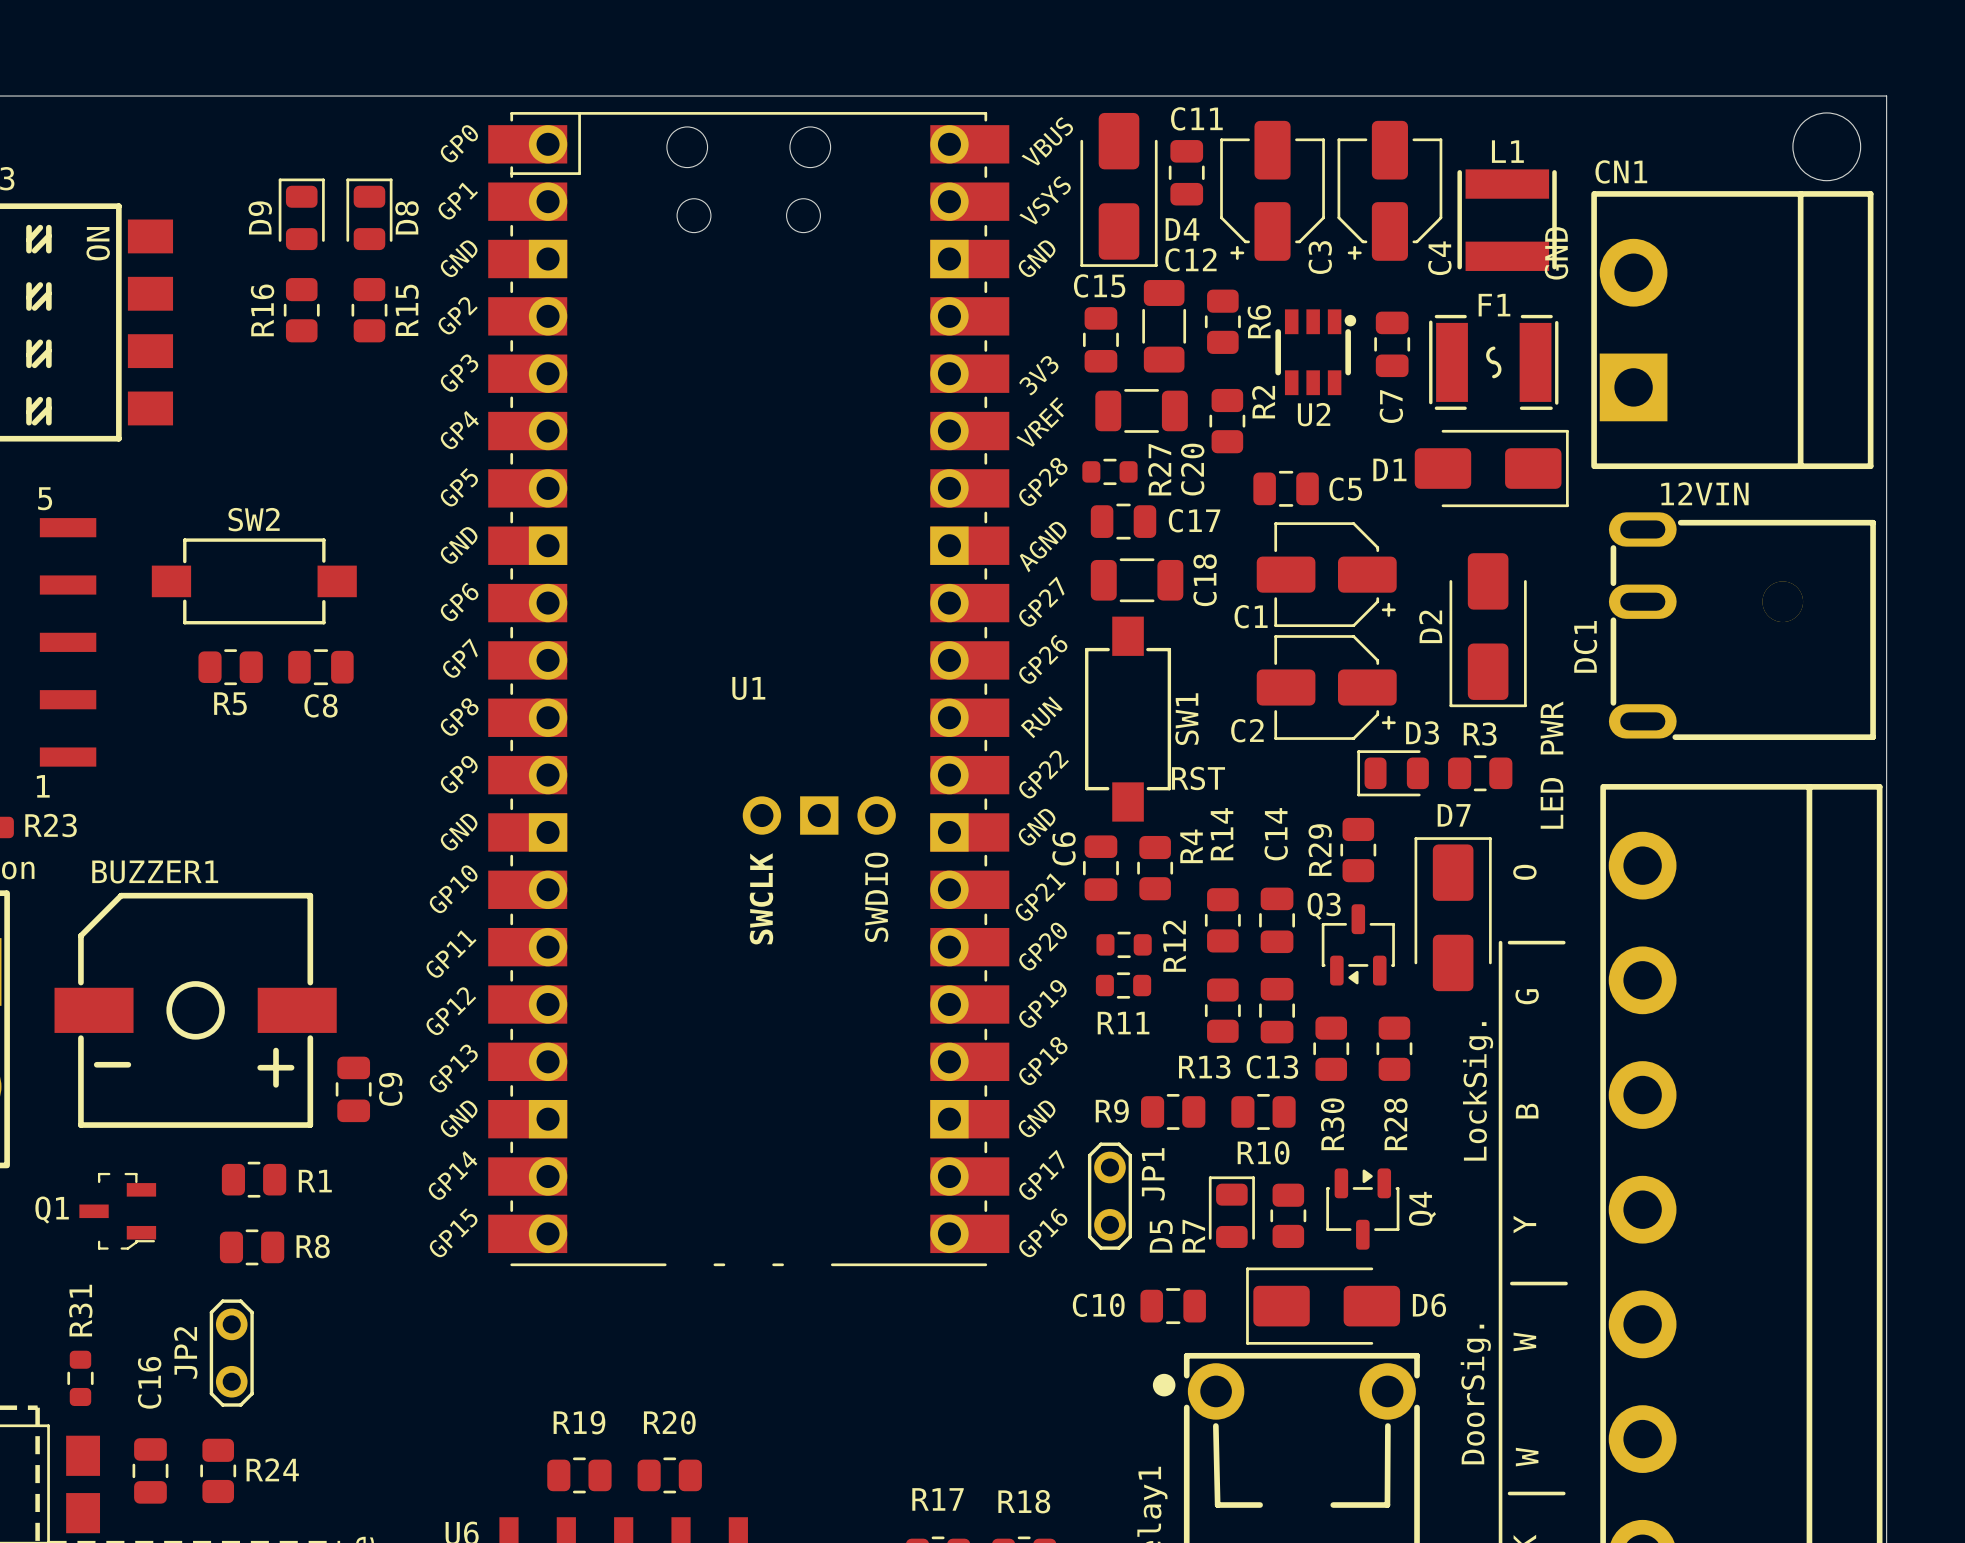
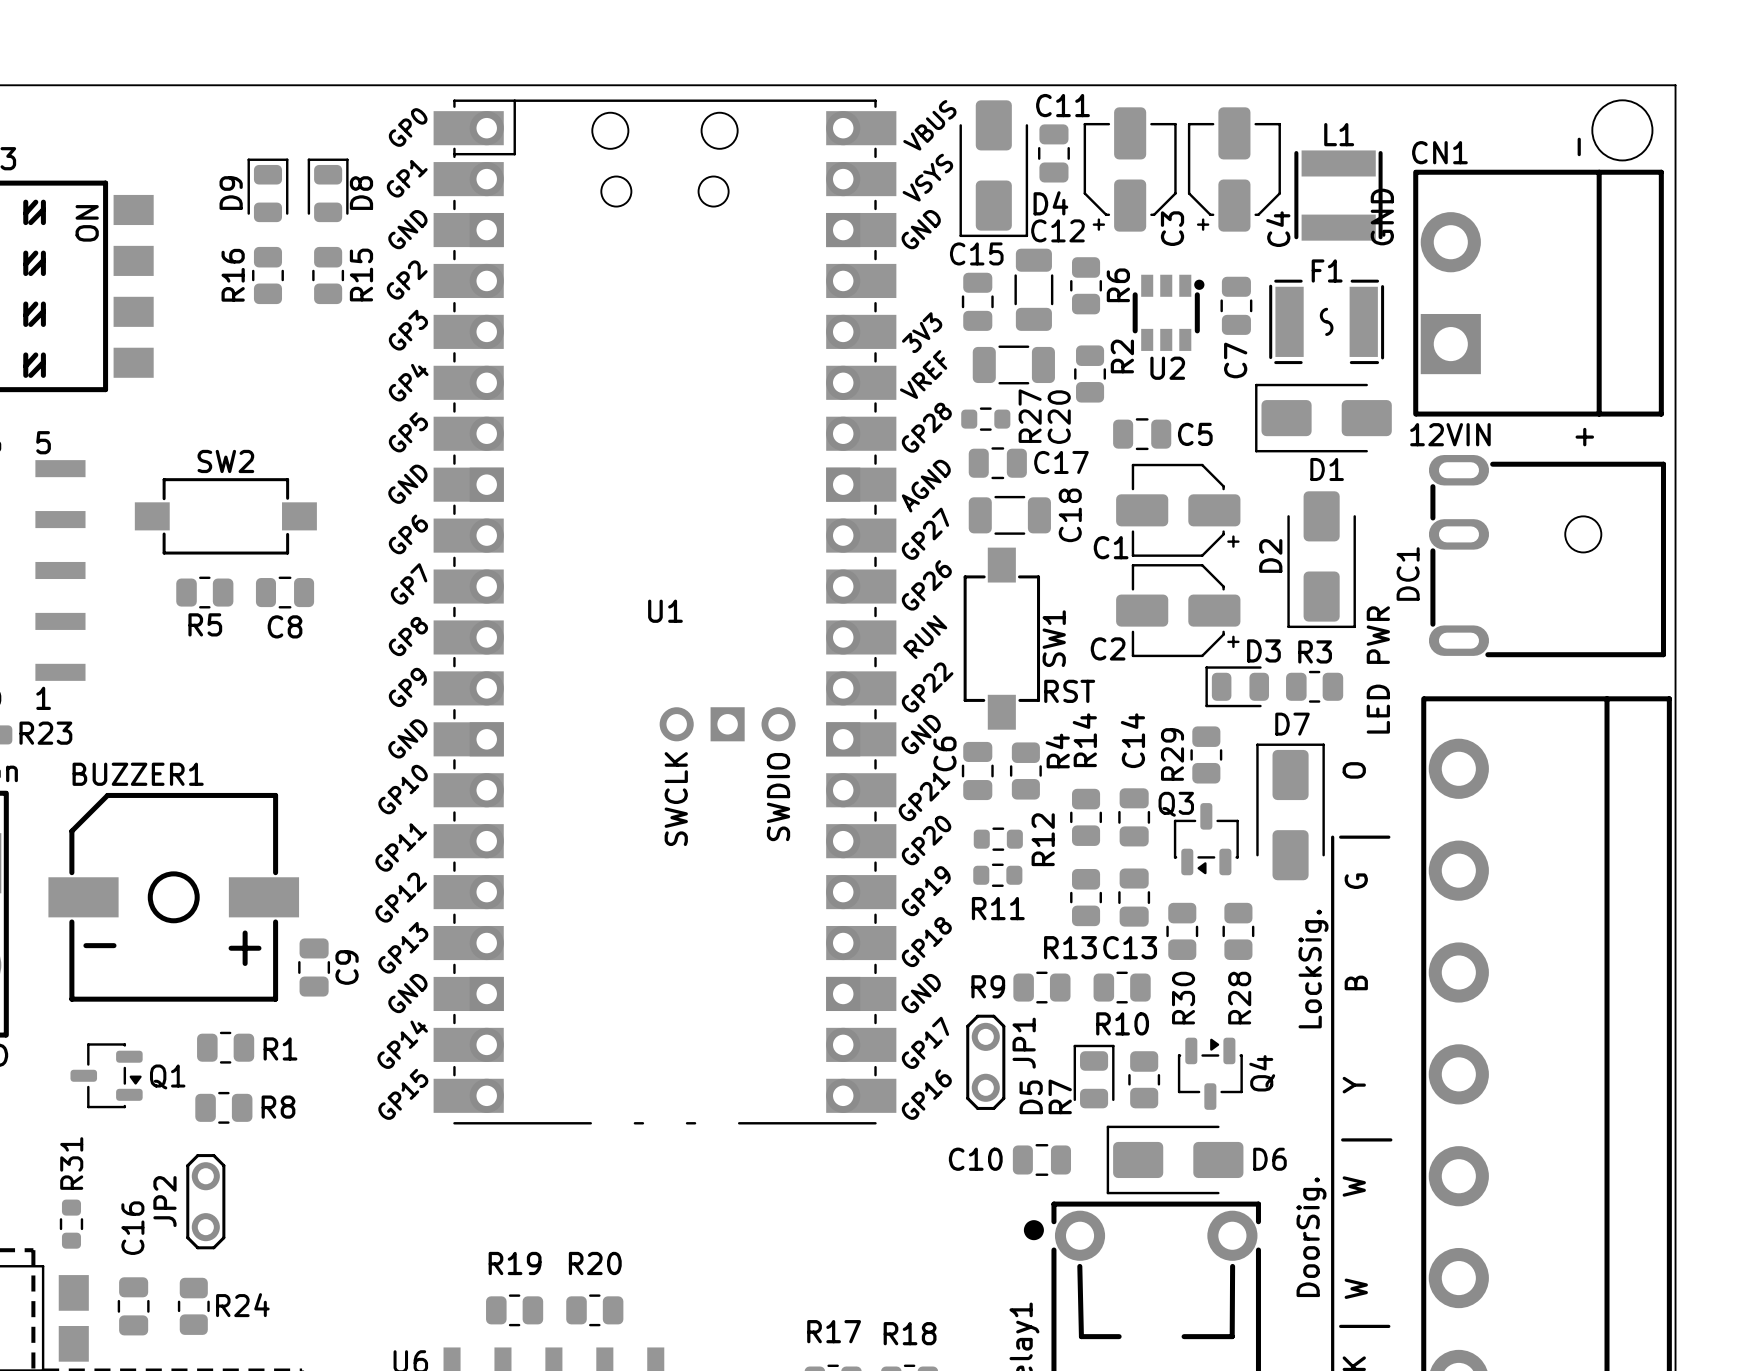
text: none -> - (1579, 146)
D1 rotation: 0° (1491, 468) -> 180° (1323, 418)
D1 name position: D1 (1389, 469) -> D1 (1327, 469)
text: none -> + (1584, 437)
text position: 12VIN (1704, 493) -> 12VIN (1450, 434)
DC1 footprint: [1608, 512, 1876, 741] -> [1428, 455, 1667, 658]
Q1 footprint: [79, 1172, 157, 1250] -> [70, 1043, 143, 1109]
Q1 name position: Q1 (52, 1210) -> Q1 (167, 1076)

